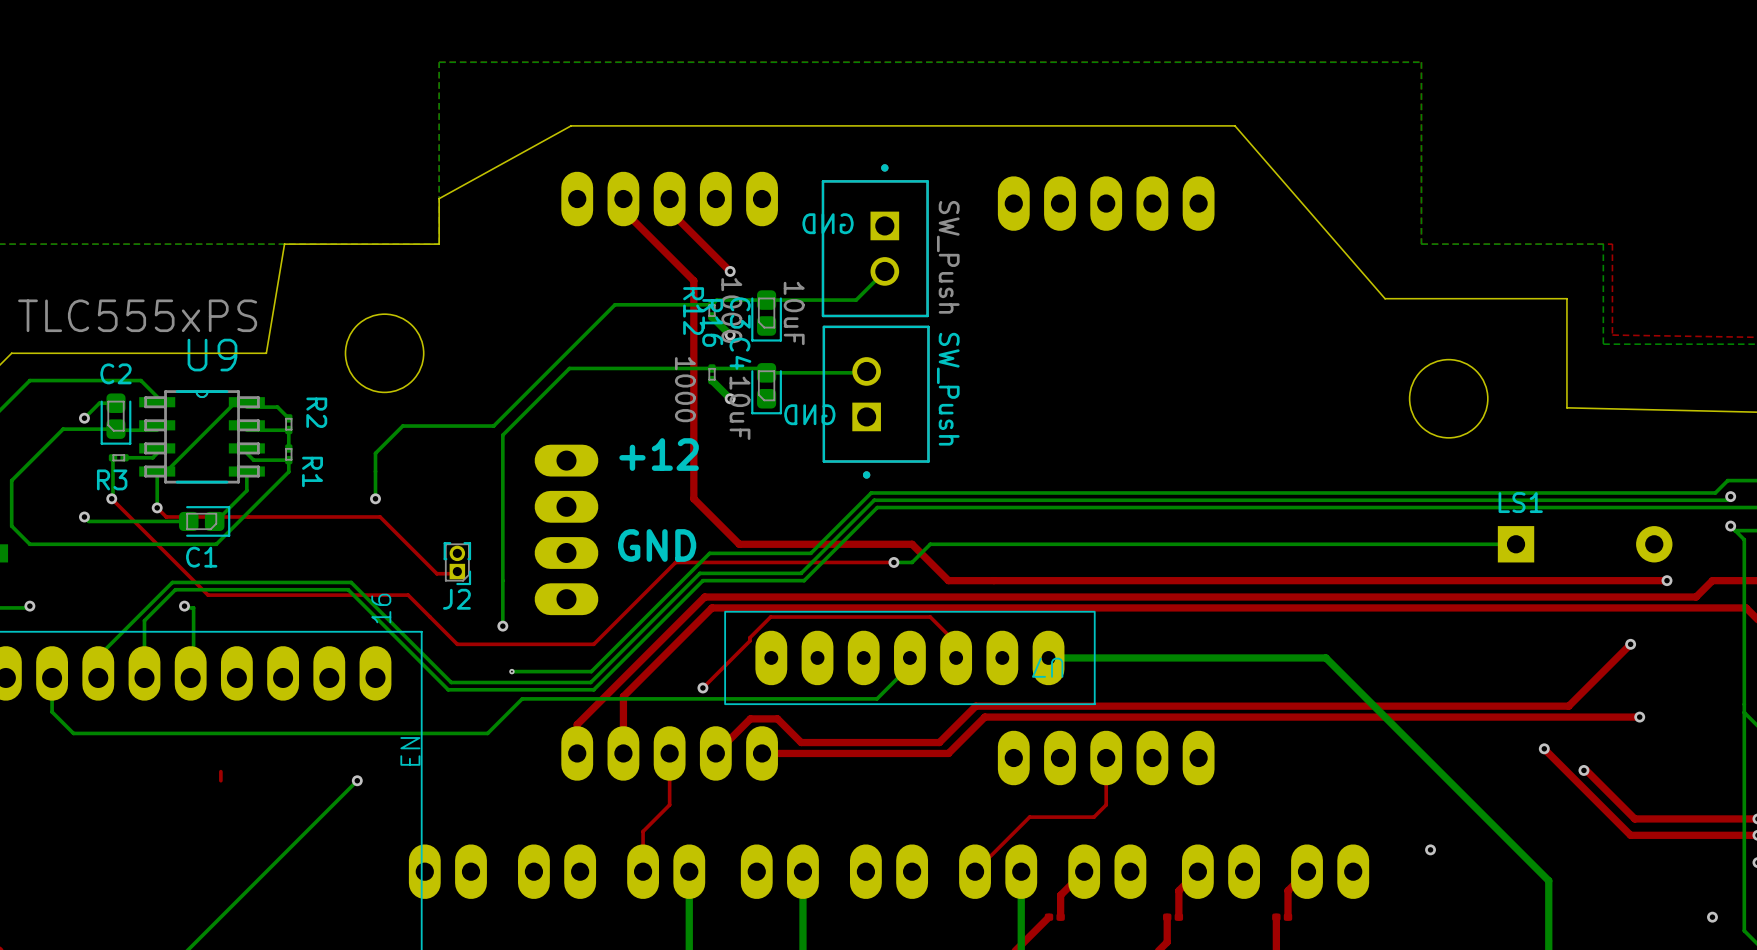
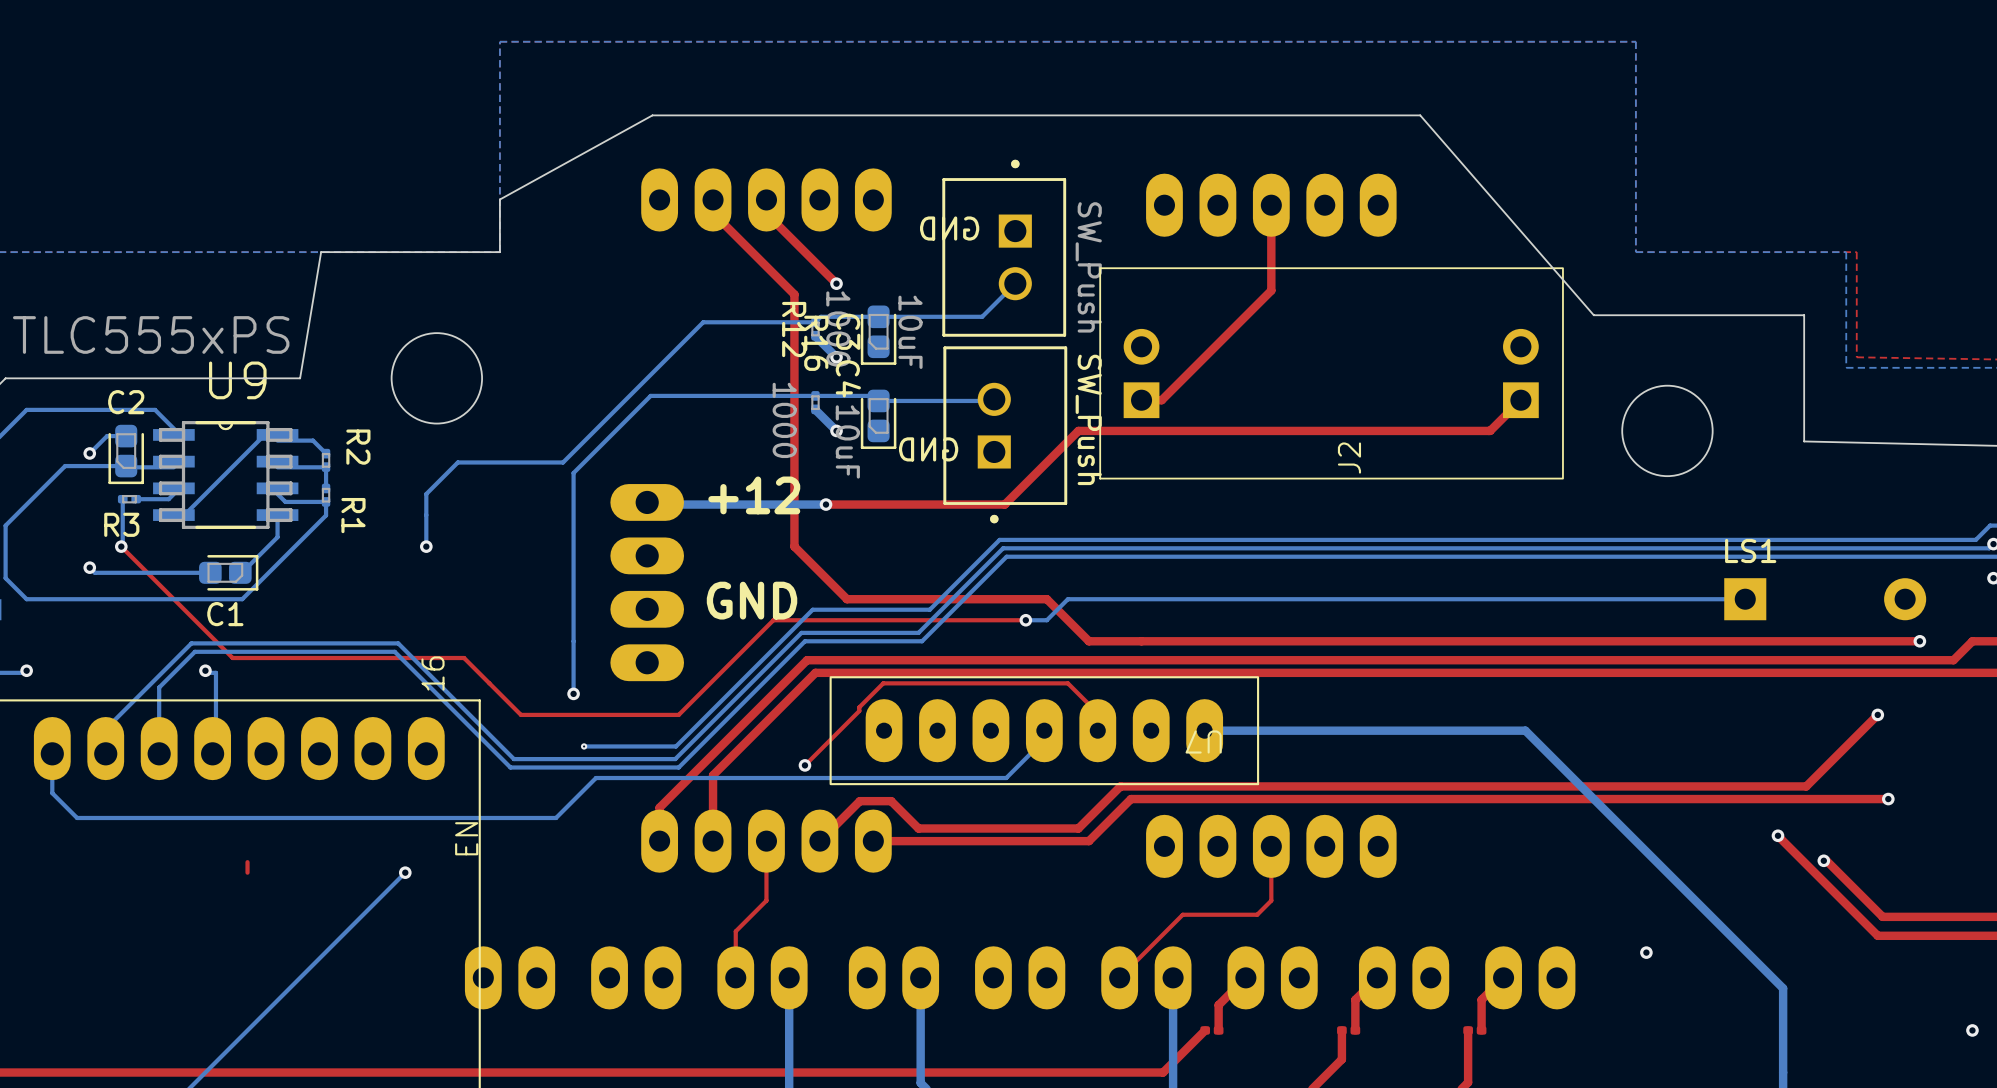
top track: none -> (1271, 205) (1271, 290) (1161, 400) (1141, 400)
top track: none -> (1520, 400) (1490, 430) (1078, 430) (1004, 504) (826, 504)
bottom track: none -> (647, 502) (649, 504) (826, 504)
via: none -> (826, 504)
bottom track: (157, 471) (157, 507) -> none
top track: (157, 507) (166, 516) (380, 516) (436, 573) (457, 573) -> none
via: (157, 507) -> none
J2 footprint: [443, 542, 472, 586] -> [1099, 267, 1564, 480]
J2 name position: J2 (456, 599) -> J2 (1349, 458)

